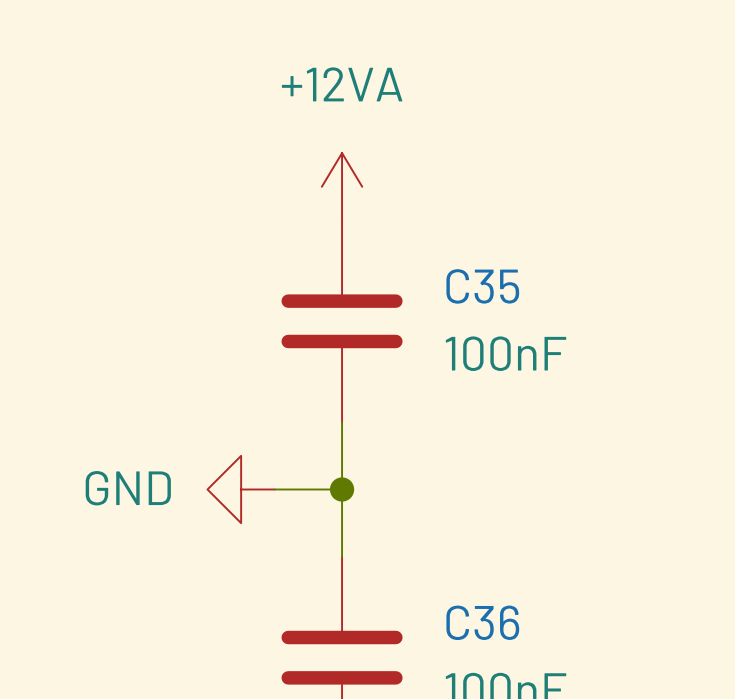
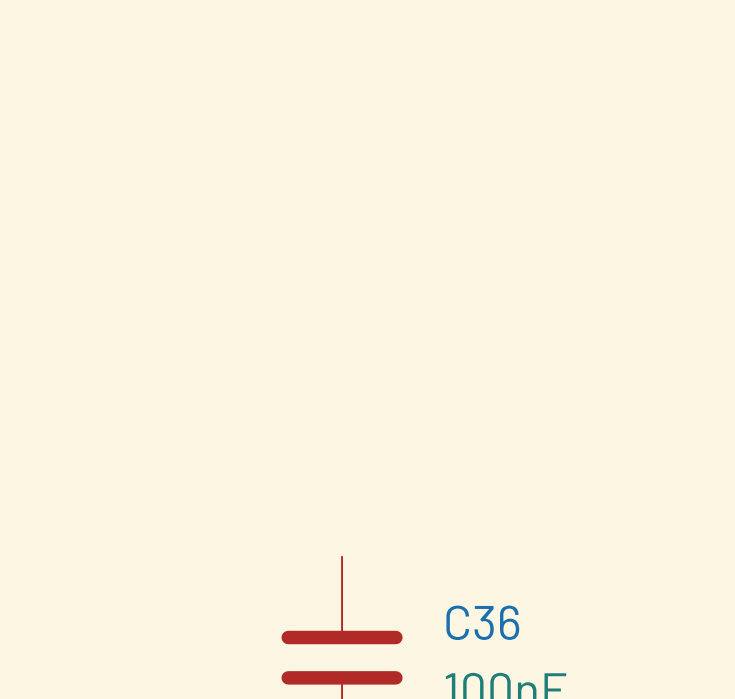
power symbol: +12VA (342, 186) -> none
C35: 100nF (342, 321) -> none
wire: (342, 422) (342, 556) -> none
power symbol: GND (241, 489) -> none
wire: (274, 489) (342, 489) -> none
junction: (342, 489) -> none

